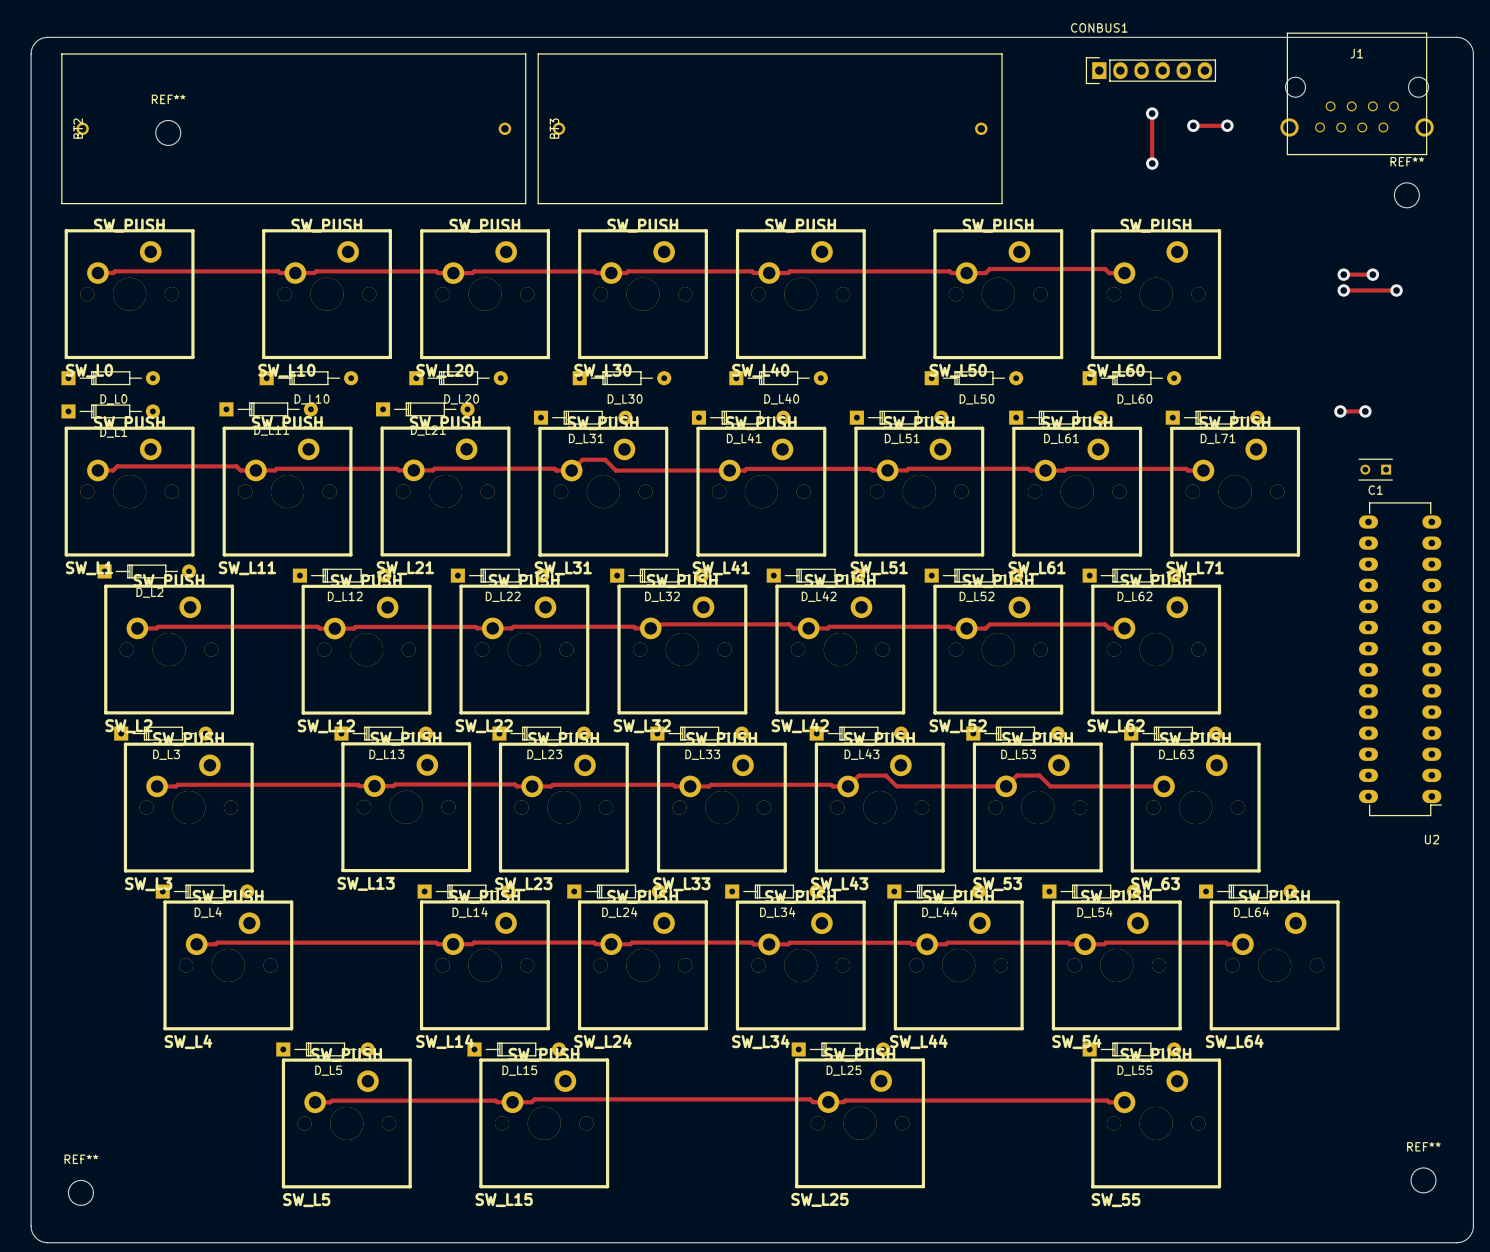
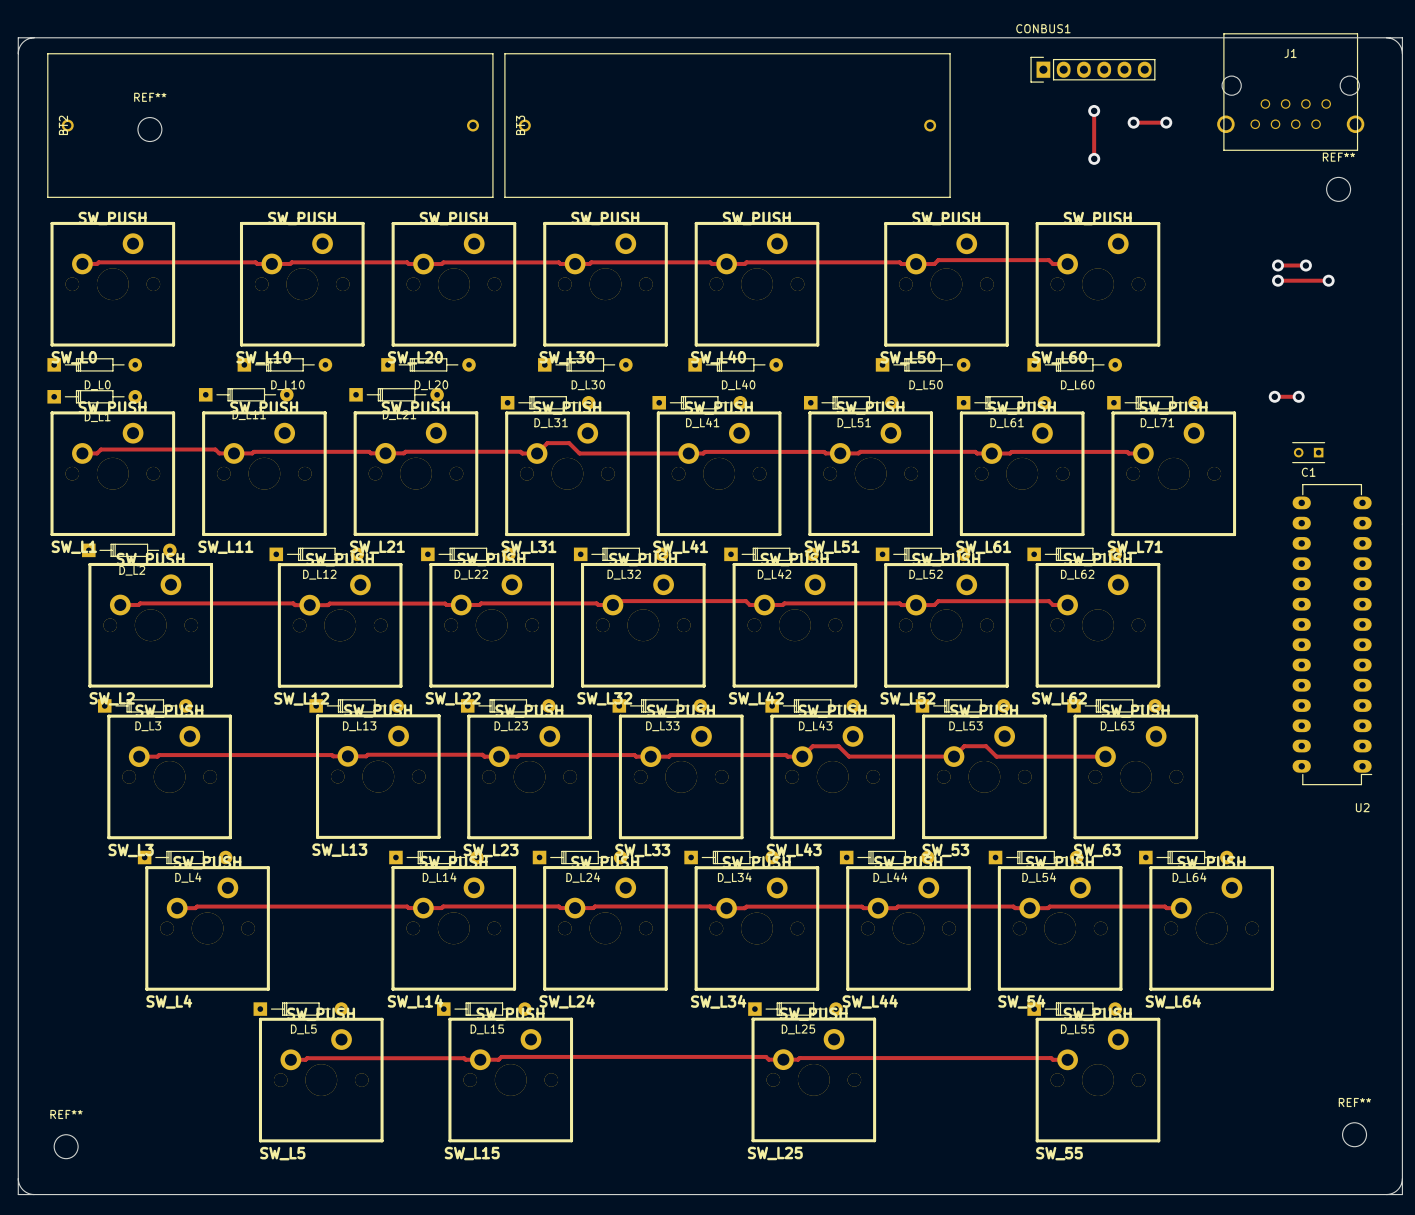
board edge: none -> (34, 37) (18, 37) (18, 53)
board edge: none -> (1386, 37) (1402, 37) (1402, 53)
board edge: none -> (18, 1178) (18, 1194) (34, 1194)
board edge: none -> (1402, 1178) (1402, 1194) (1386, 1194)

